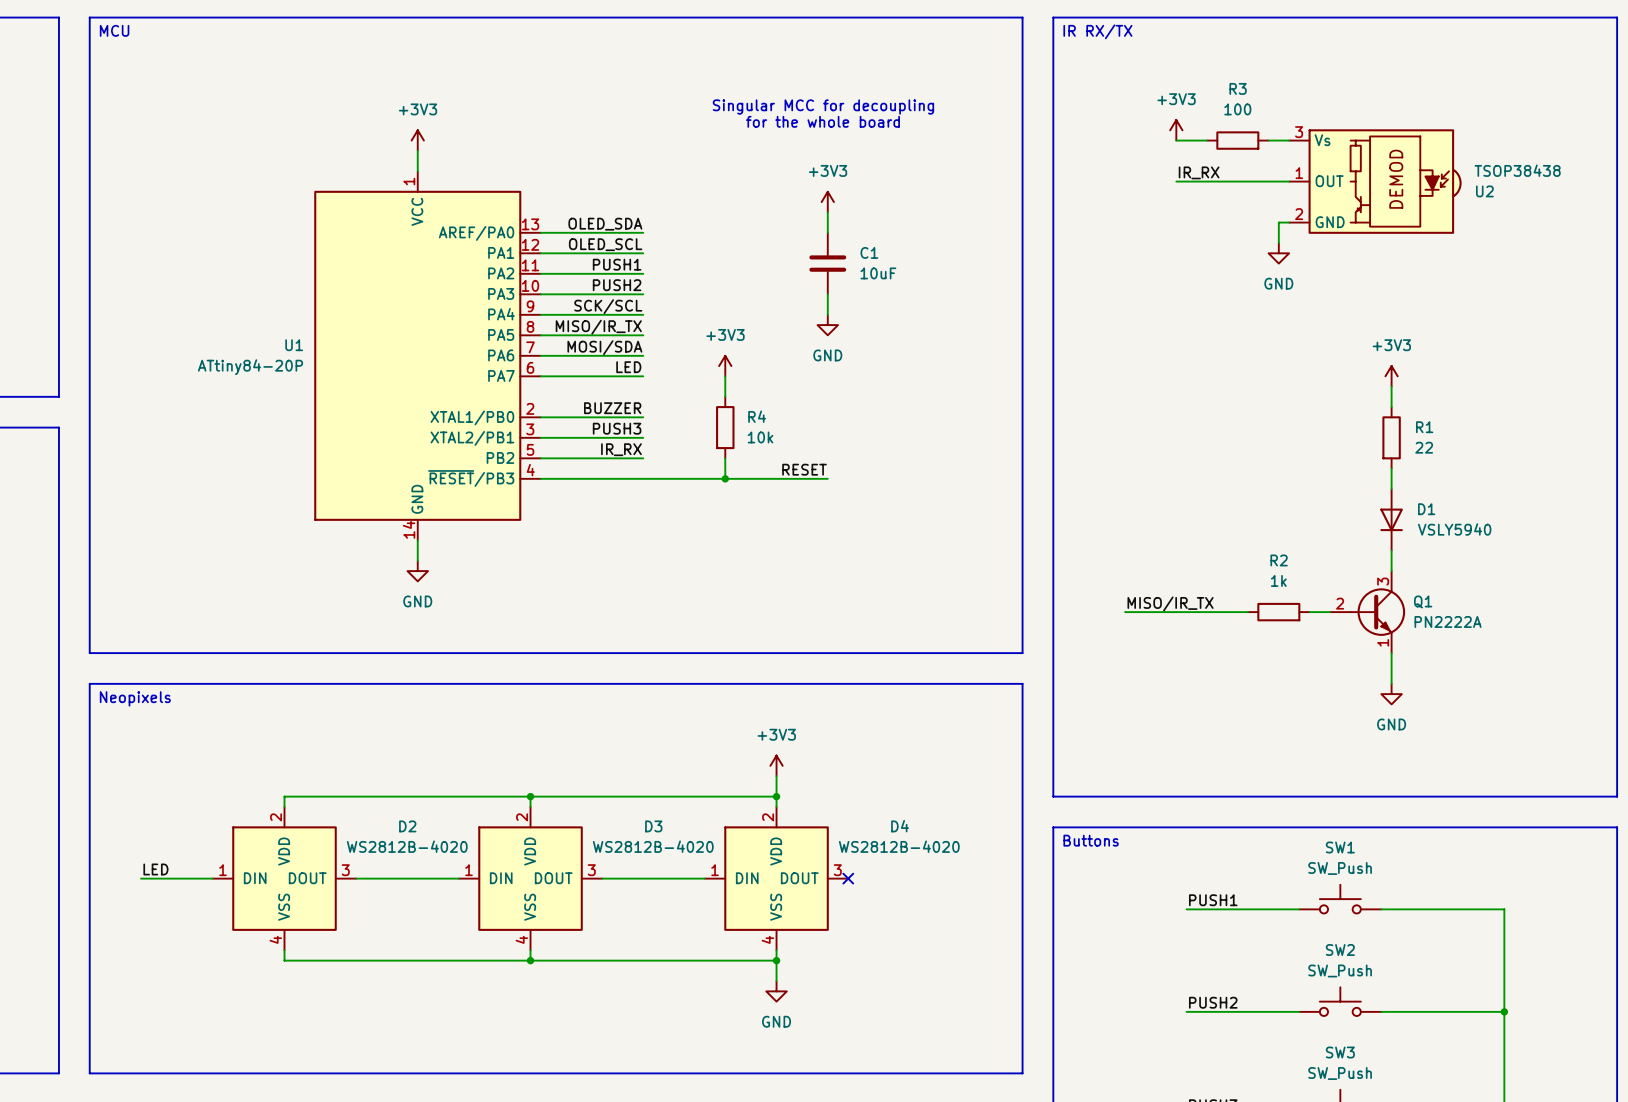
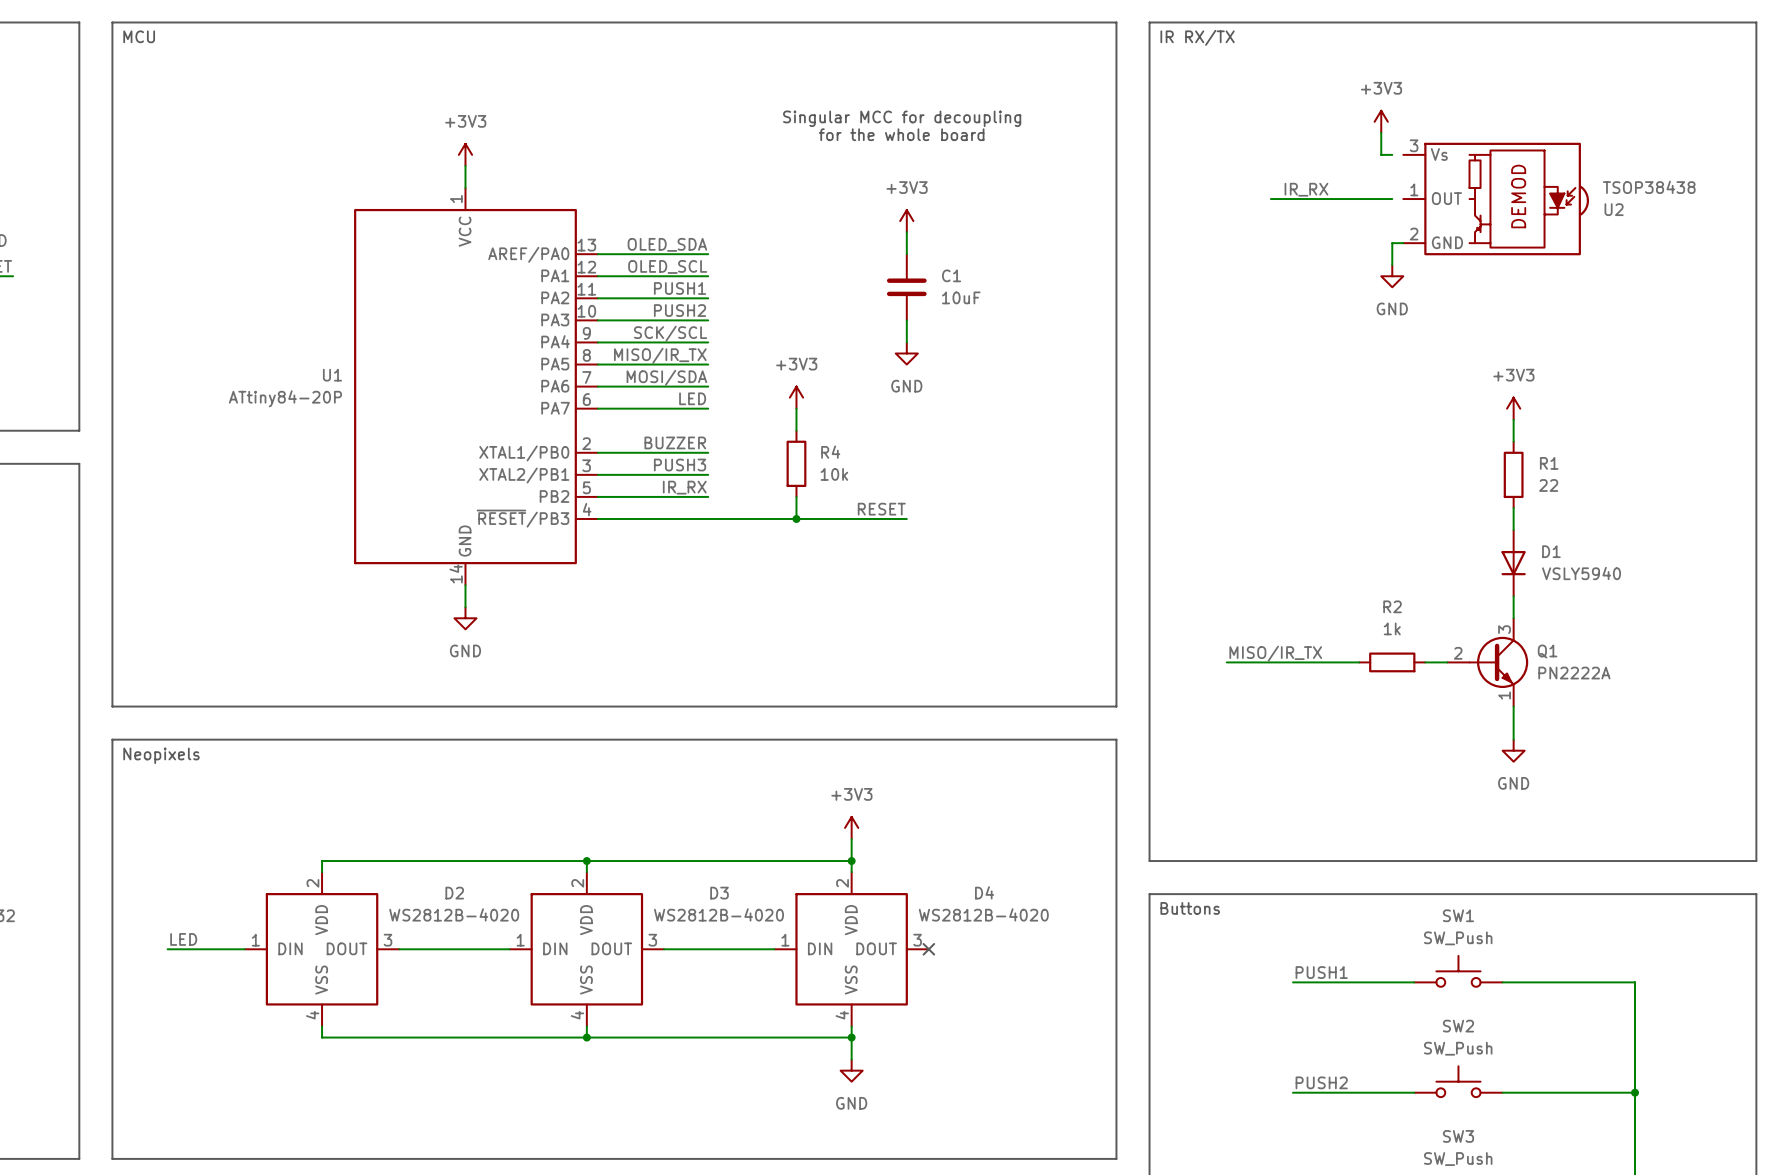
wire: none -> (1381, 132) (1381, 154)
power symbol position: +3V3 (1176, 130) -> +3V3 (1381, 121)
wire: (1176, 140) (1207, 140) -> none
R3: 100 (1237, 140) -> none
wire: (1278, 140) (1289, 140) -> none
wire: (1278, 181) (1289, 181) -> (1270, 199) (1281, 199)

